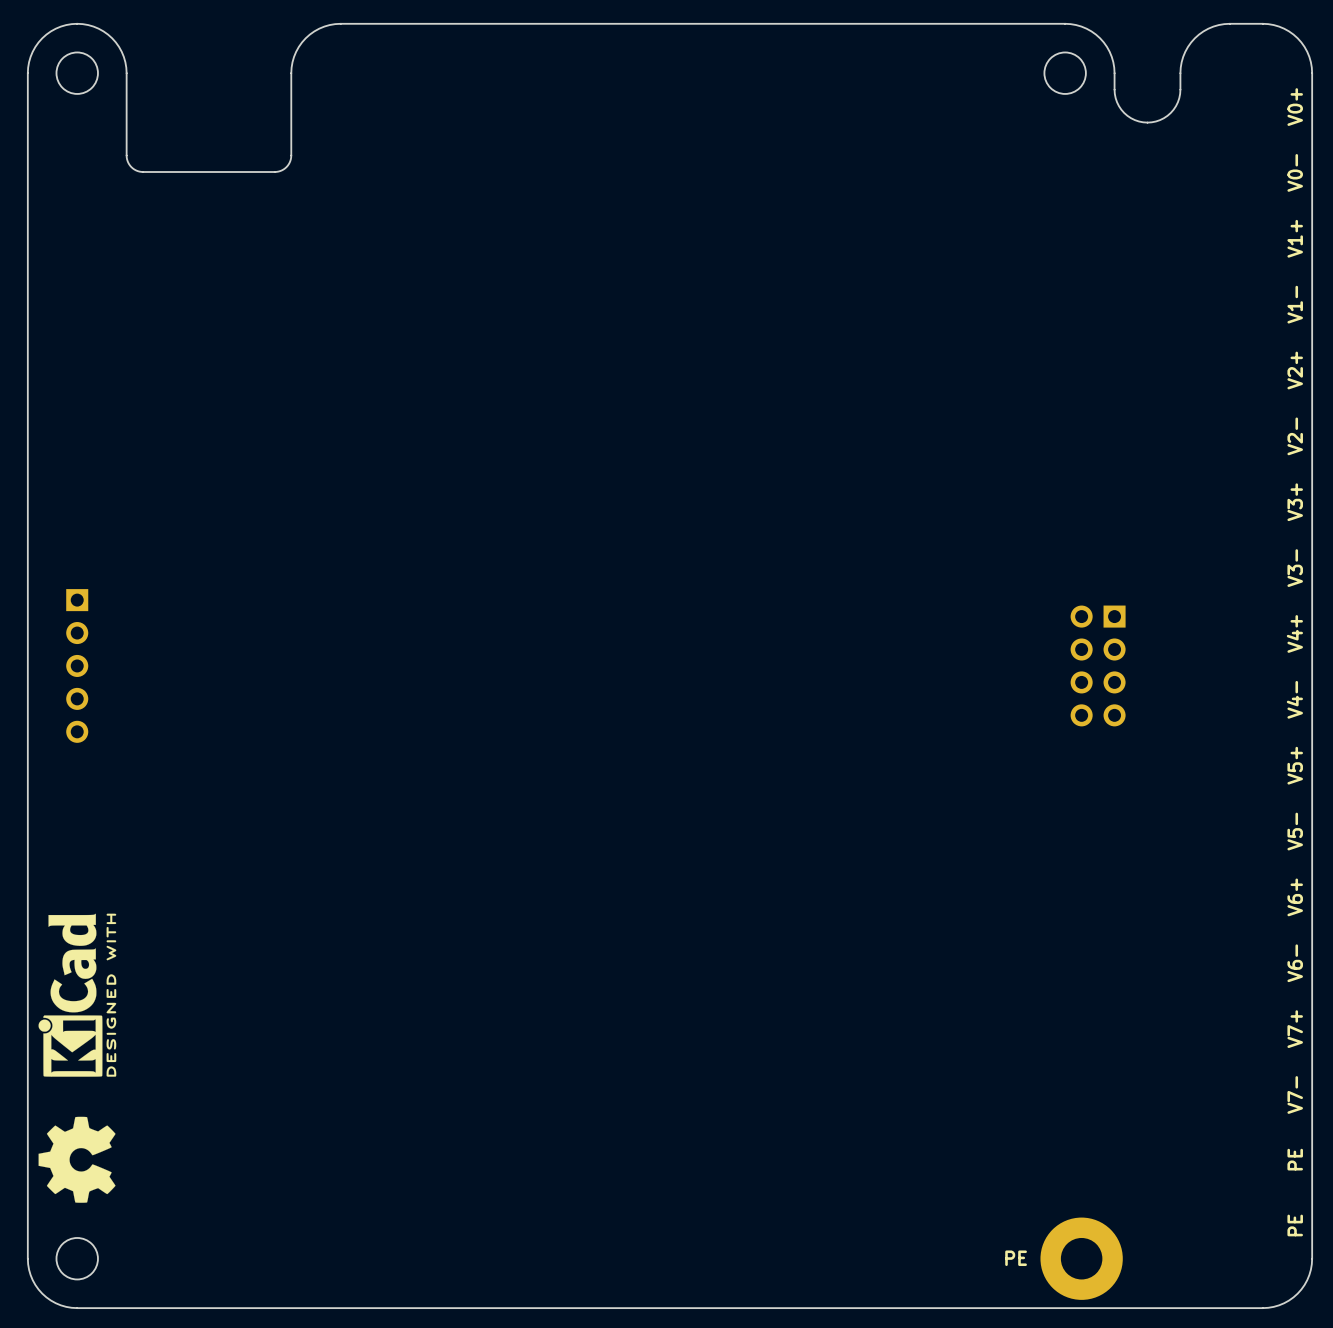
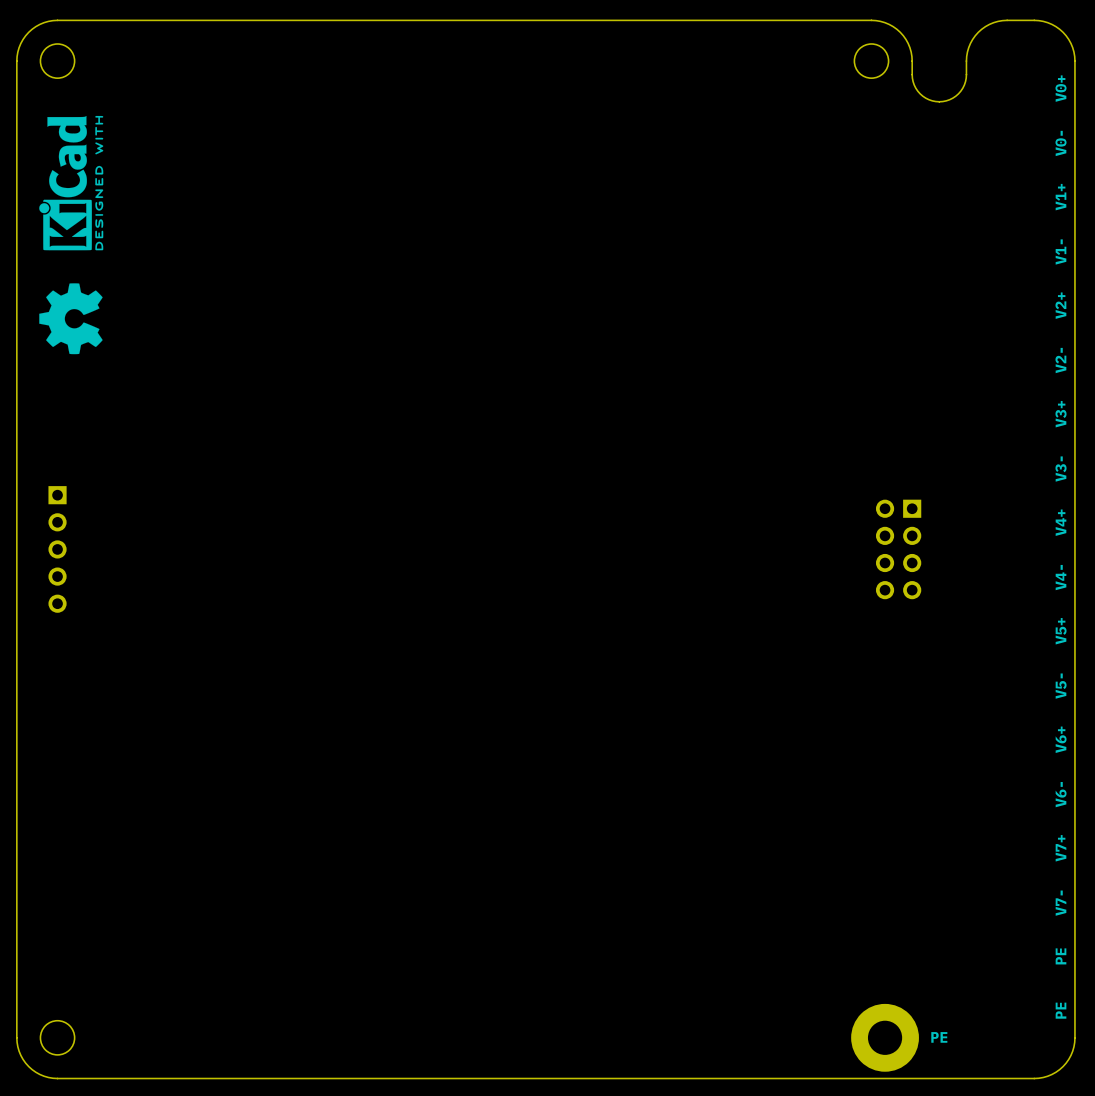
board edge: (340, 23) (324, 26) (314, 31) (302, 42) (296, 51) (291, 73) (290, 159) (285, 168) (274, 172) (143, 172) (132, 168) (126, 157) (126, 73) (123, 56) (115, 42) (103, 31) (88, 25) (77, 23) -> (274, 20) (57, 20)
drawing: none -> [39, 115, 104, 251]
drawing: none -> [39, 283, 103, 355]
drawing: [38, 913, 117, 1077] -> none
drawing: [38, 1116, 116, 1203] -> none
text position: PE (1016, 1258) -> PE (939, 1037)

